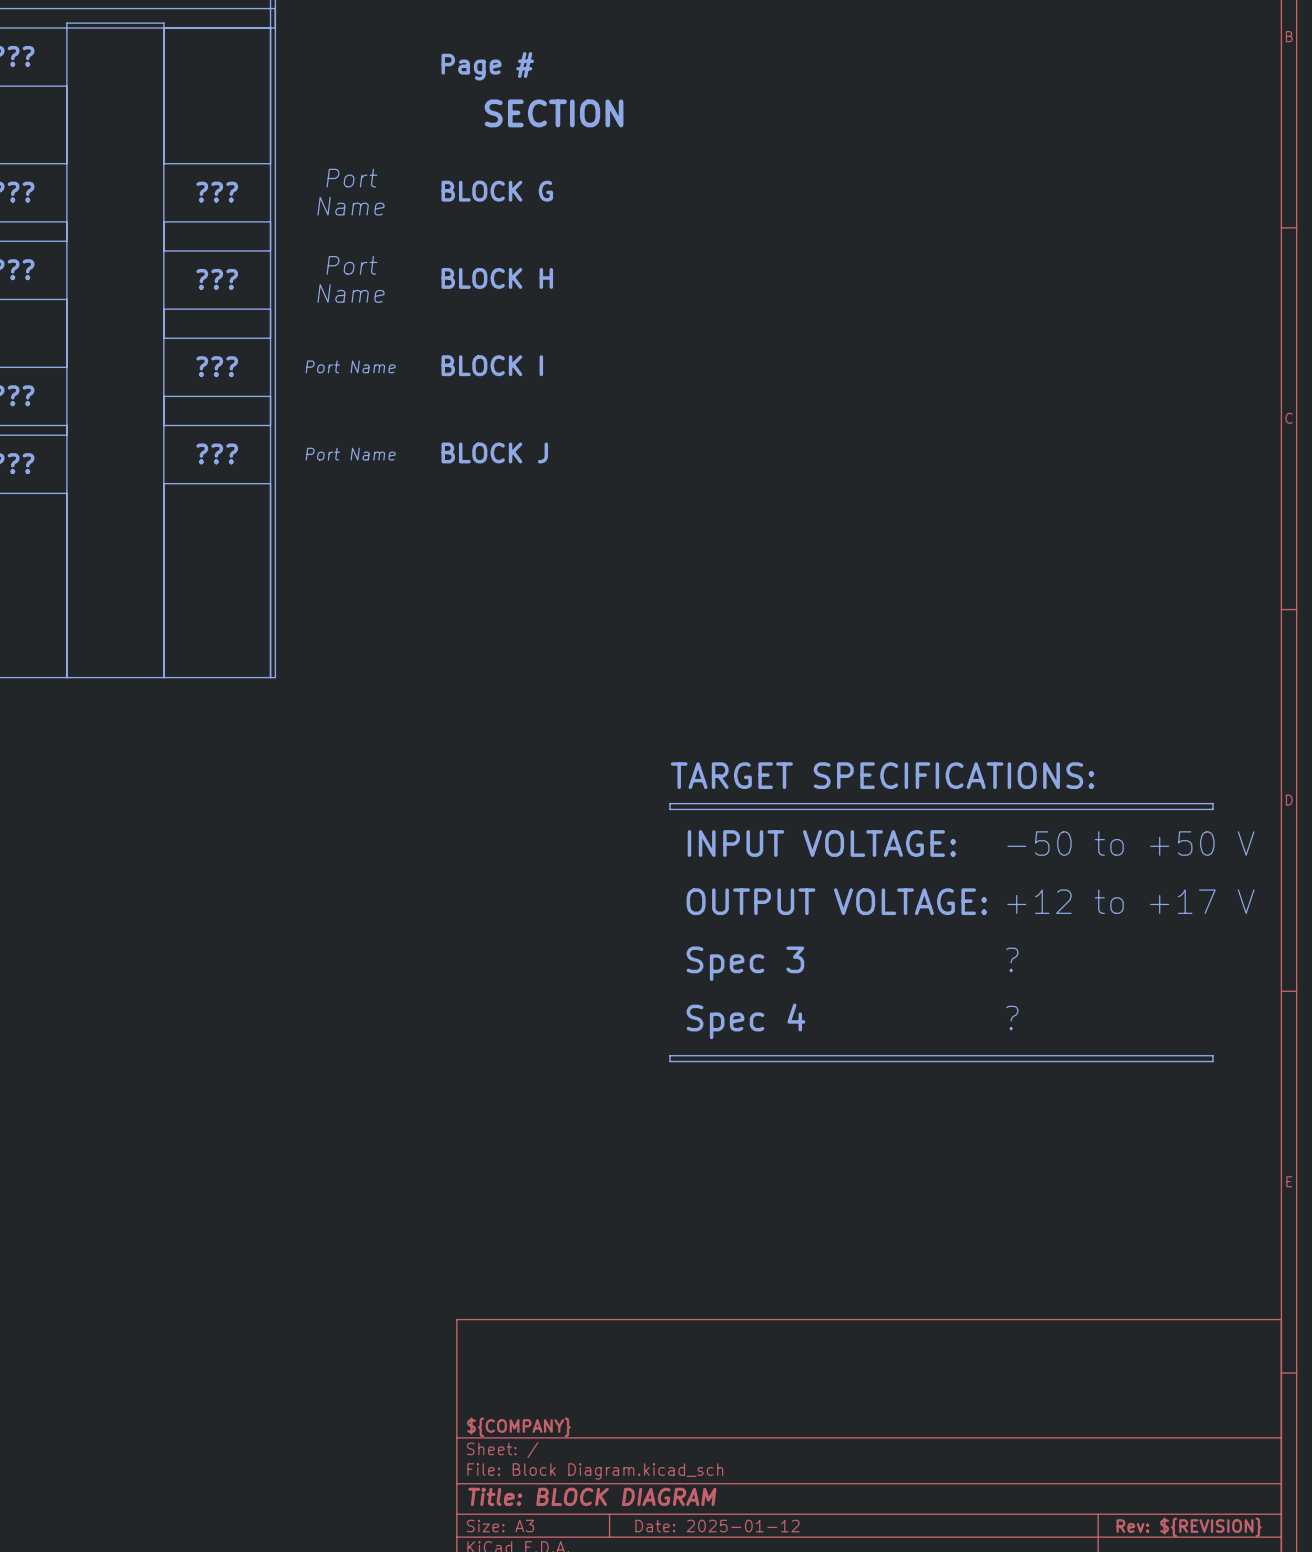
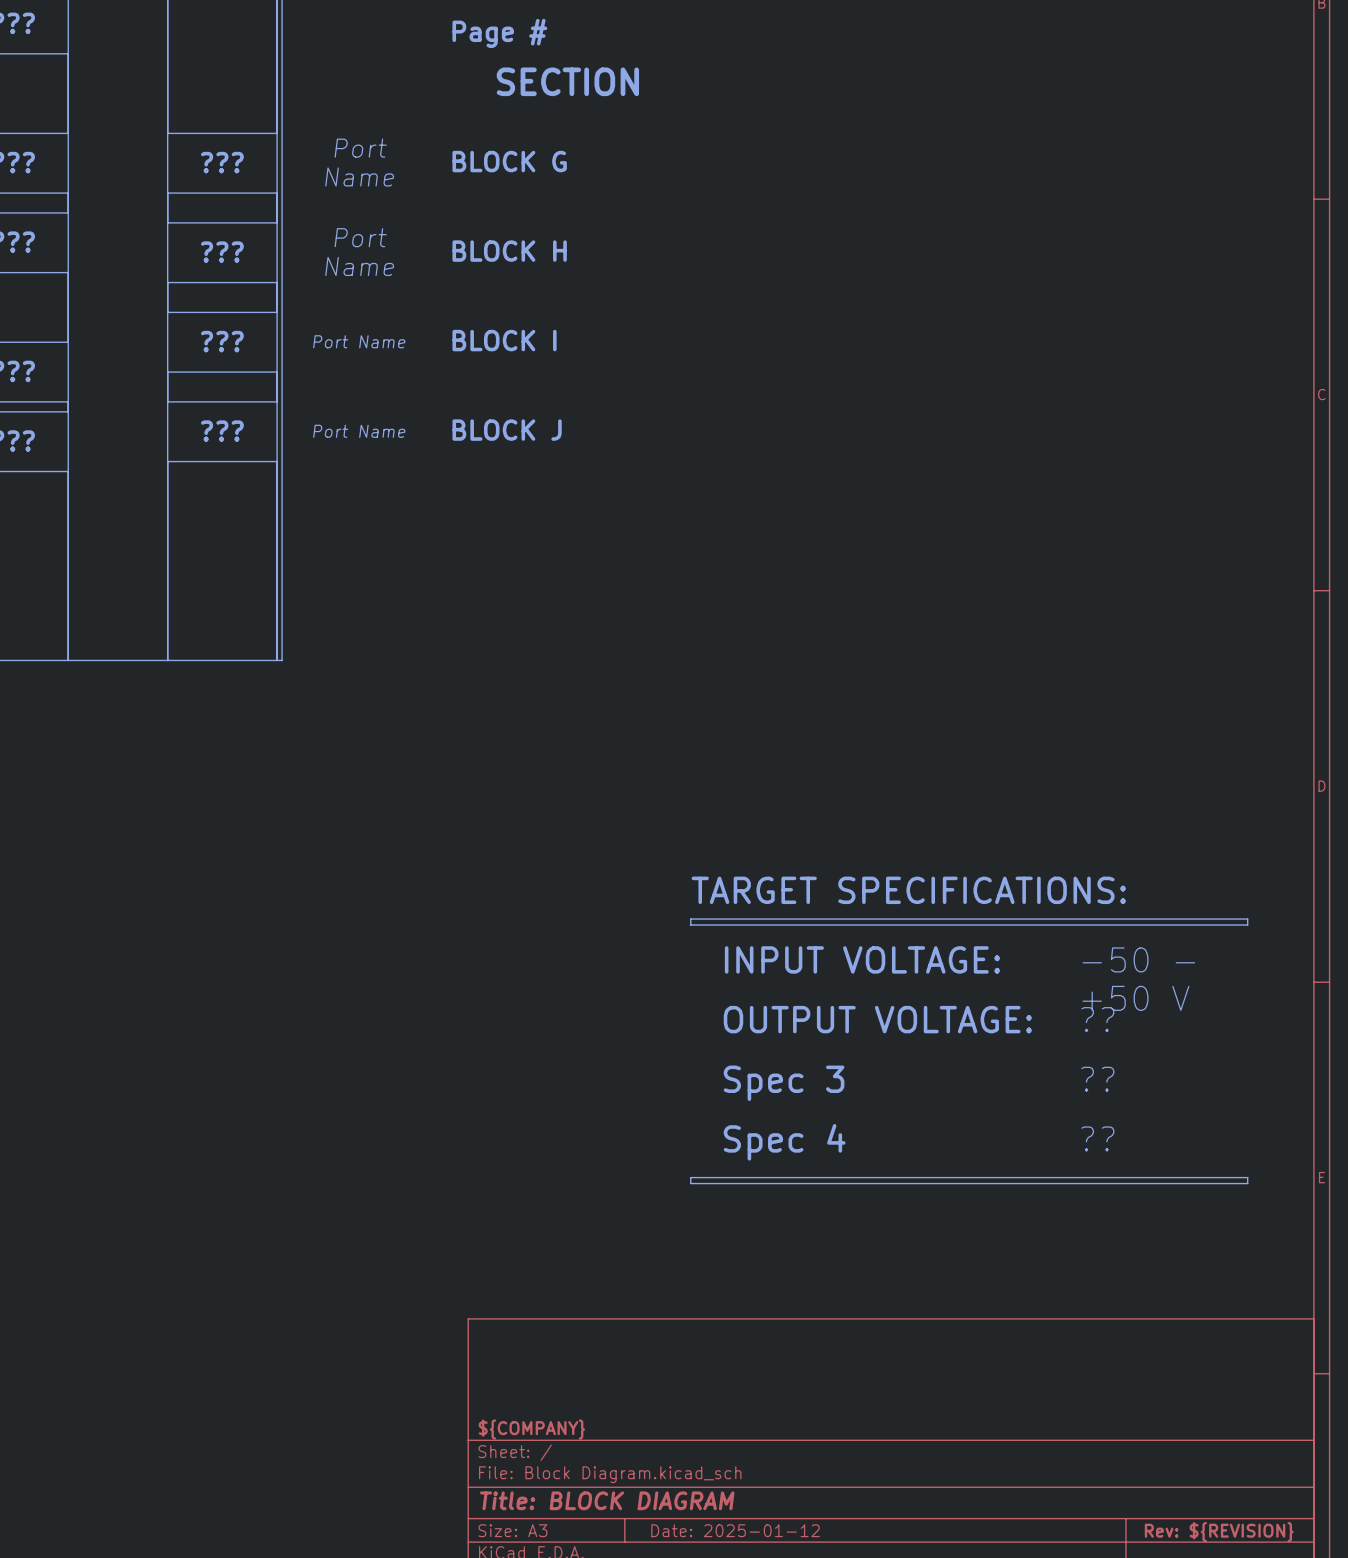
text position: TARGET SPECIFICATIONS: (882, 775) -> TARGET SPECIFICATIONS: (908, 890)
line: (669, 803) (669, 809) (1212, 809) (1212, 803) (669, 803) -> (690, 919) (690, 924) (1247, 924) (1247, 919) (690, 919)
text position: INPUT VOLTAGE: (821, 843) -> INPUT VOLTAGE: (862, 959)
text: -50 to +50 V (1130, 843) -> none
text position: OUTPUT VOLTAGE: (836, 901) -> OUTPUT VOLTAGE: (877, 1019)
text: +12 to +17 V (1130, 901) -> none
text: ? (1012, 959) -> none
text position: Spec 3 (745, 963) -> Spec 3 (784, 1083)
text: none -> -50 - (1138, 959)
text: none -> +50 V (1135, 998)
text: ? (1012, 1018) -> none
text position: Spec 4 (745, 1021) -> Spec 4 (784, 1142)
text: none -> ?? (1097, 1019)
line: (669, 1055) (1212, 1055) (1212, 1061) (669, 1061) (669, 1055) -> (690, 1177) (1247, 1177) (1247, 1183) (690, 1183) (690, 1177)
text: none -> ?? (1097, 1079)
text: none -> ?? (1097, 1138)

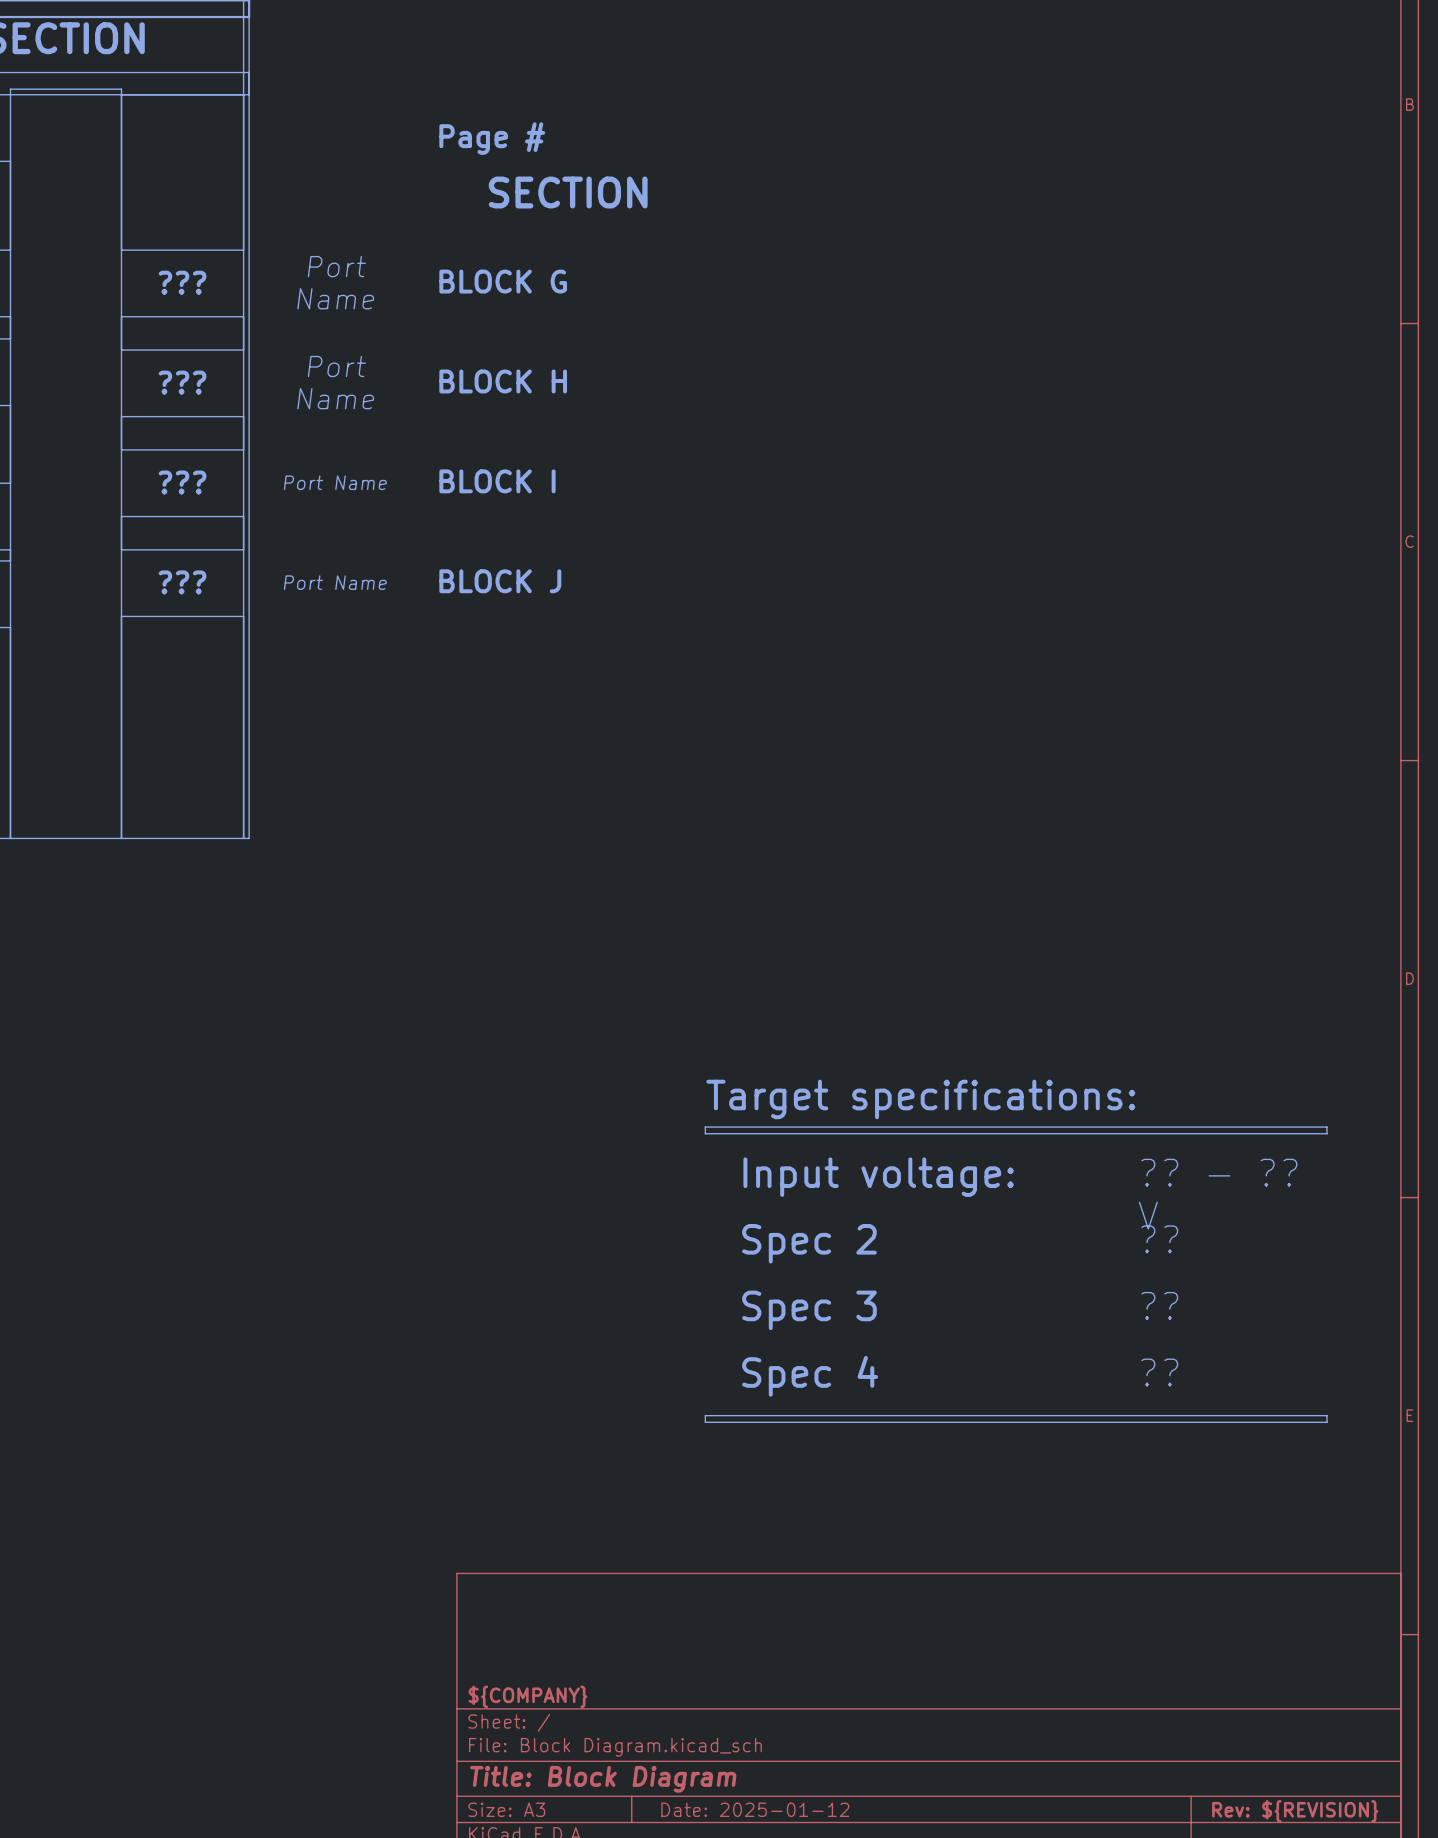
text: TARGET SPECIFICATIONS: (908, 890) -> Target specifications: (920, 1099)
text: INPUT VOLTAGE: (862, 959) -> Input voltage: (878, 1177)
text: -50 - (1138, 959) -> ?? - ?? (1219, 1172)
text: +50 V (1135, 998) -> V (1148, 1215)
text: OUTPUT VOLTAGE: (877, 1019) -> Spec 2 (809, 1243)
title block: Title: BLOCK DIAGRAM (607, 1500) -> Title: Block Diagram (603, 1779)

